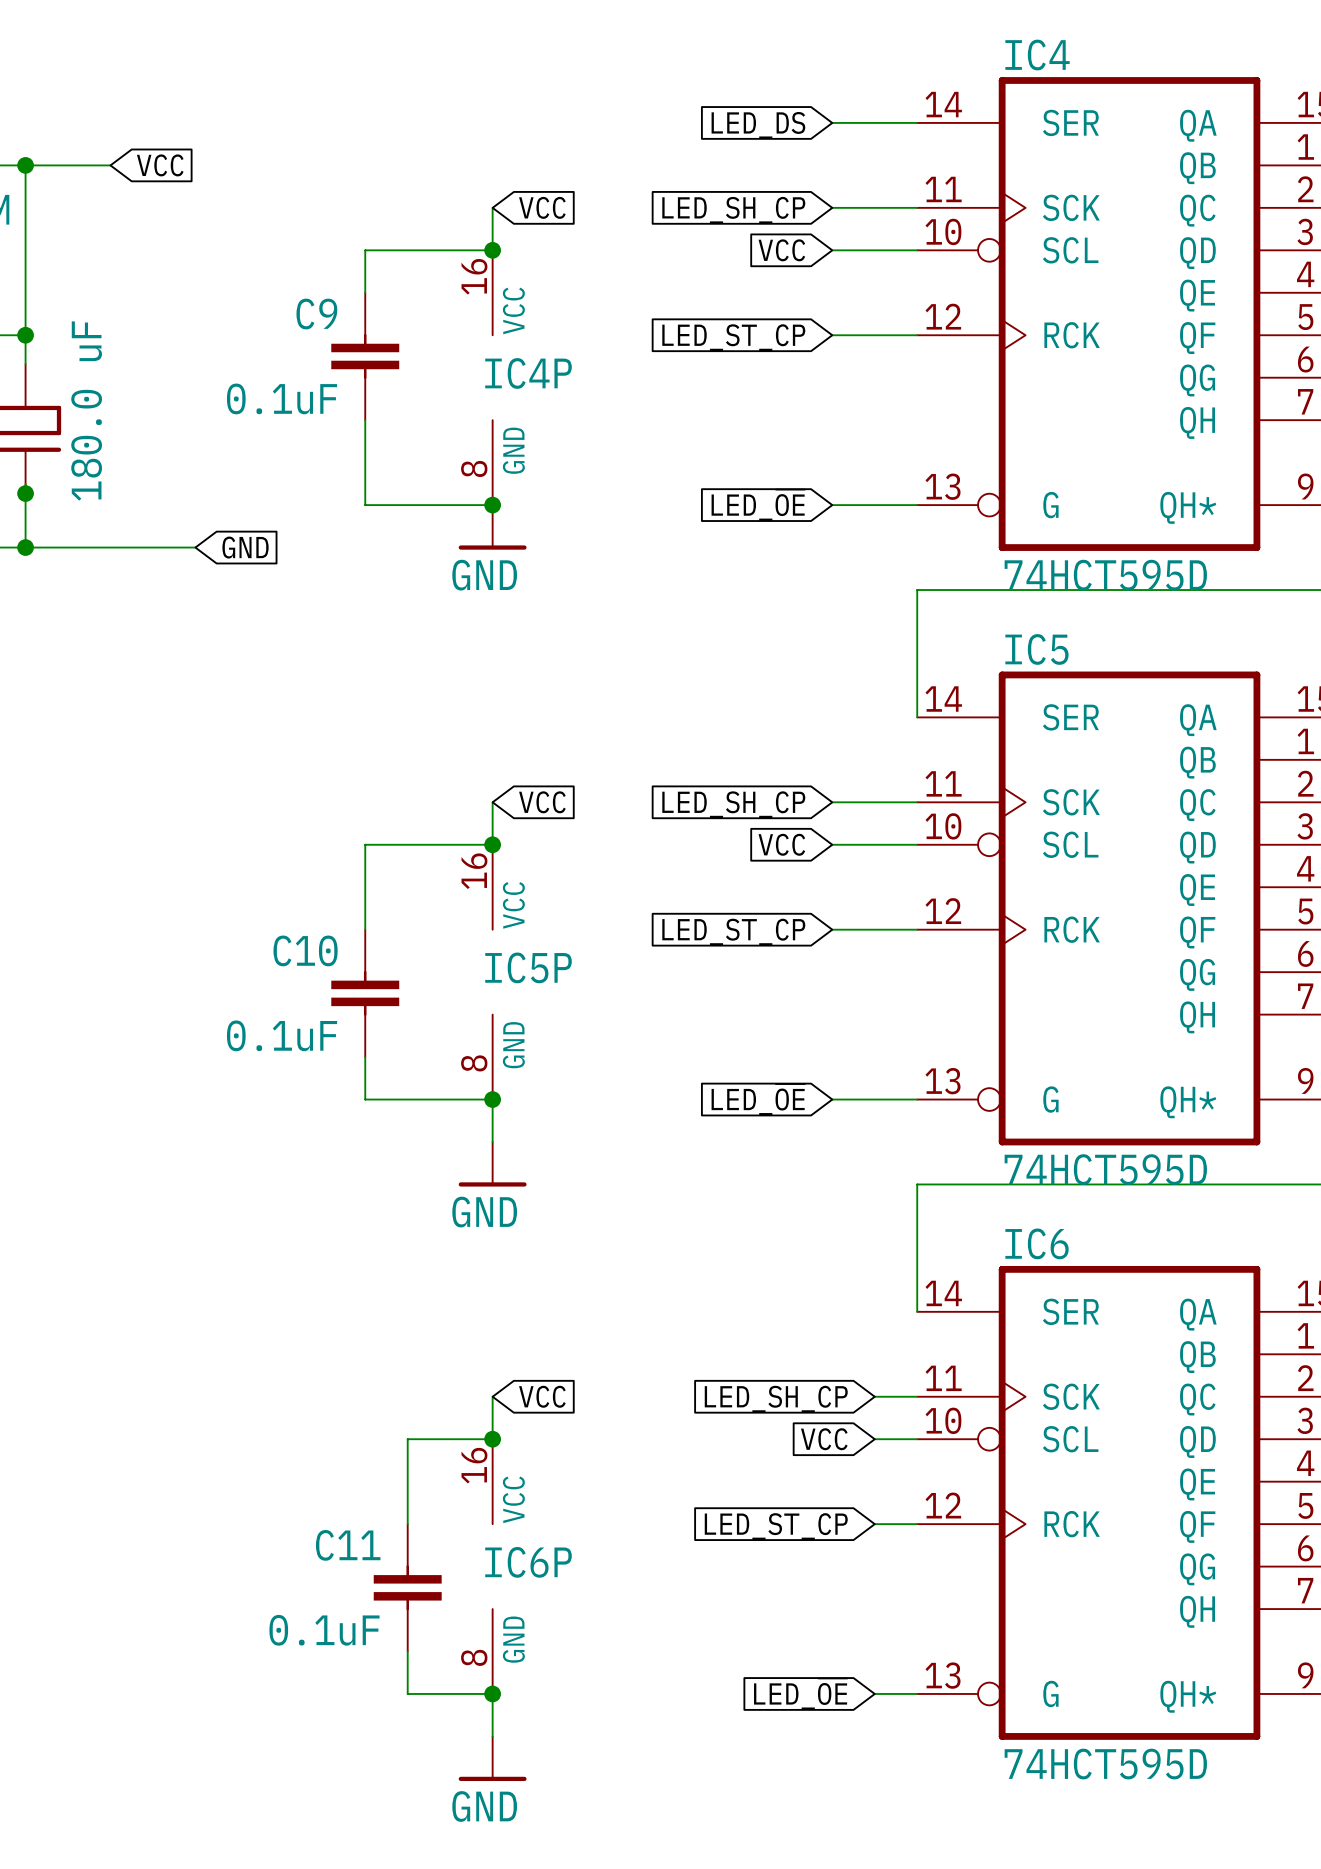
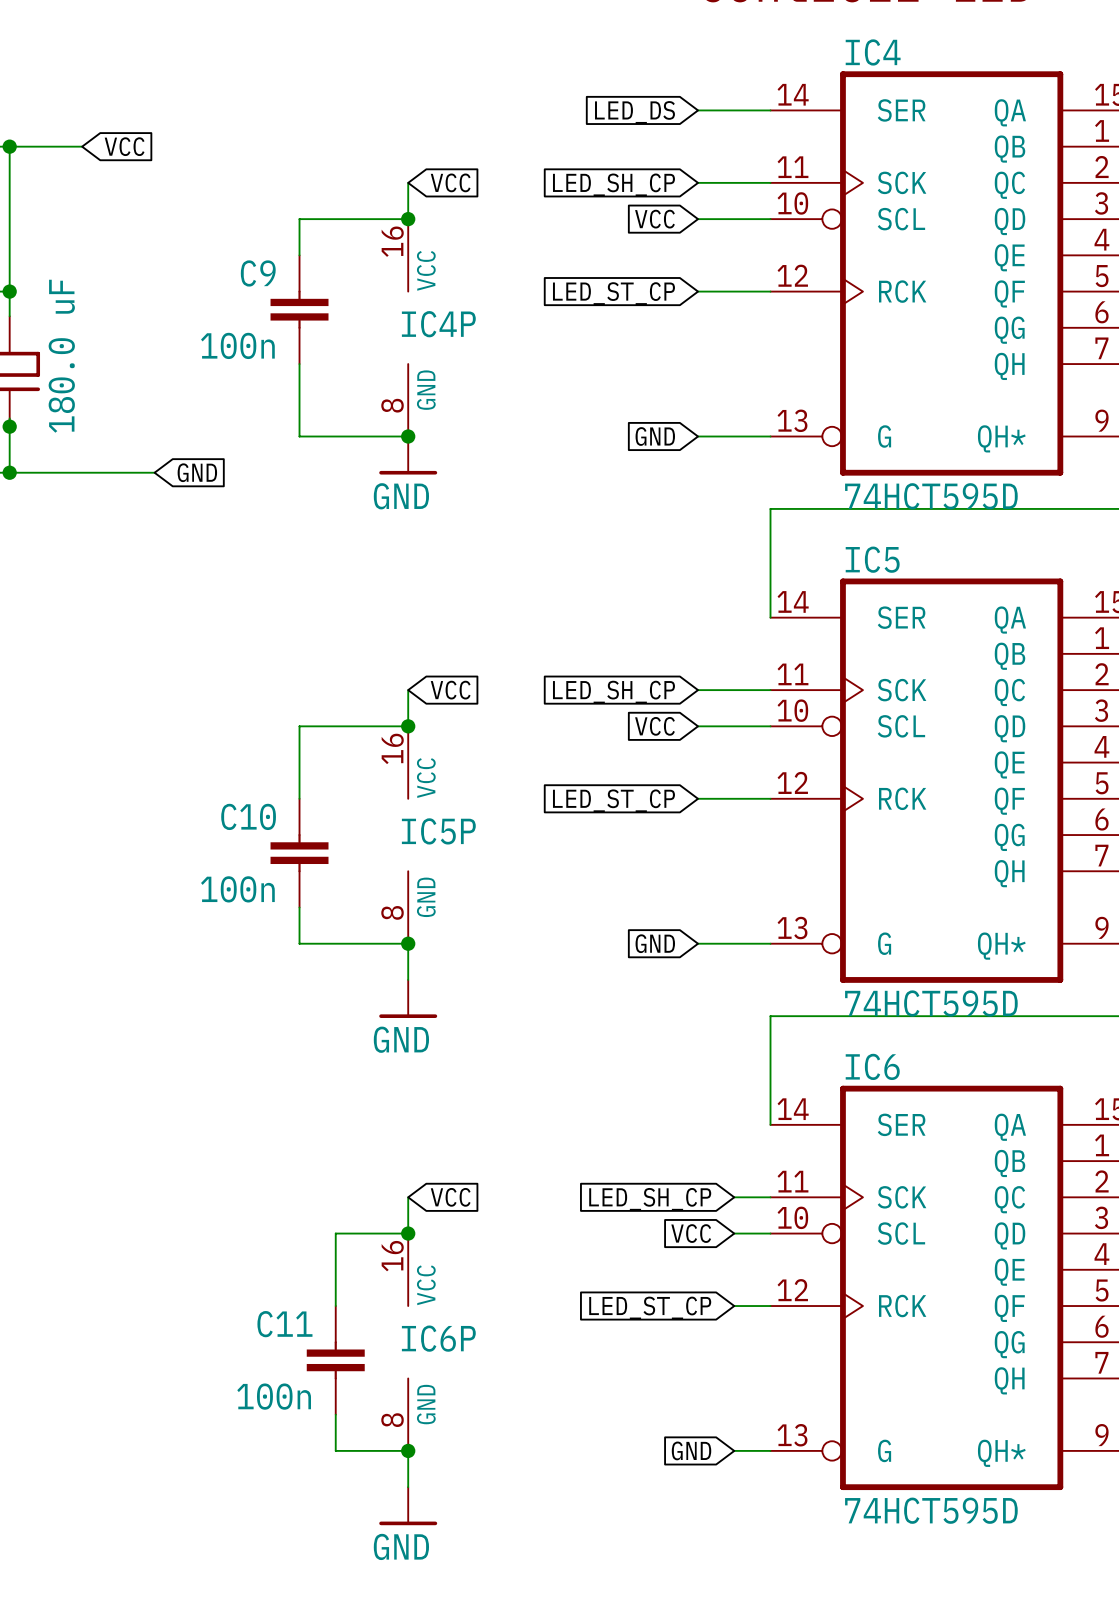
C9 value: 0.1uF (282, 398) -> 100n (237, 345)
global label: LED_~{OE} (758, 505) -> GND (655, 436)
C10 value: 0.1uF (282, 1035) -> 100n (237, 889)
global label: LED_~{OE} (758, 1099) -> GND (655, 943)
C11 value: 0.1uF (324, 1630) -> 100n (274, 1396)
global label: LED_~{OE} (800, 1694) -> GND (691, 1450)

